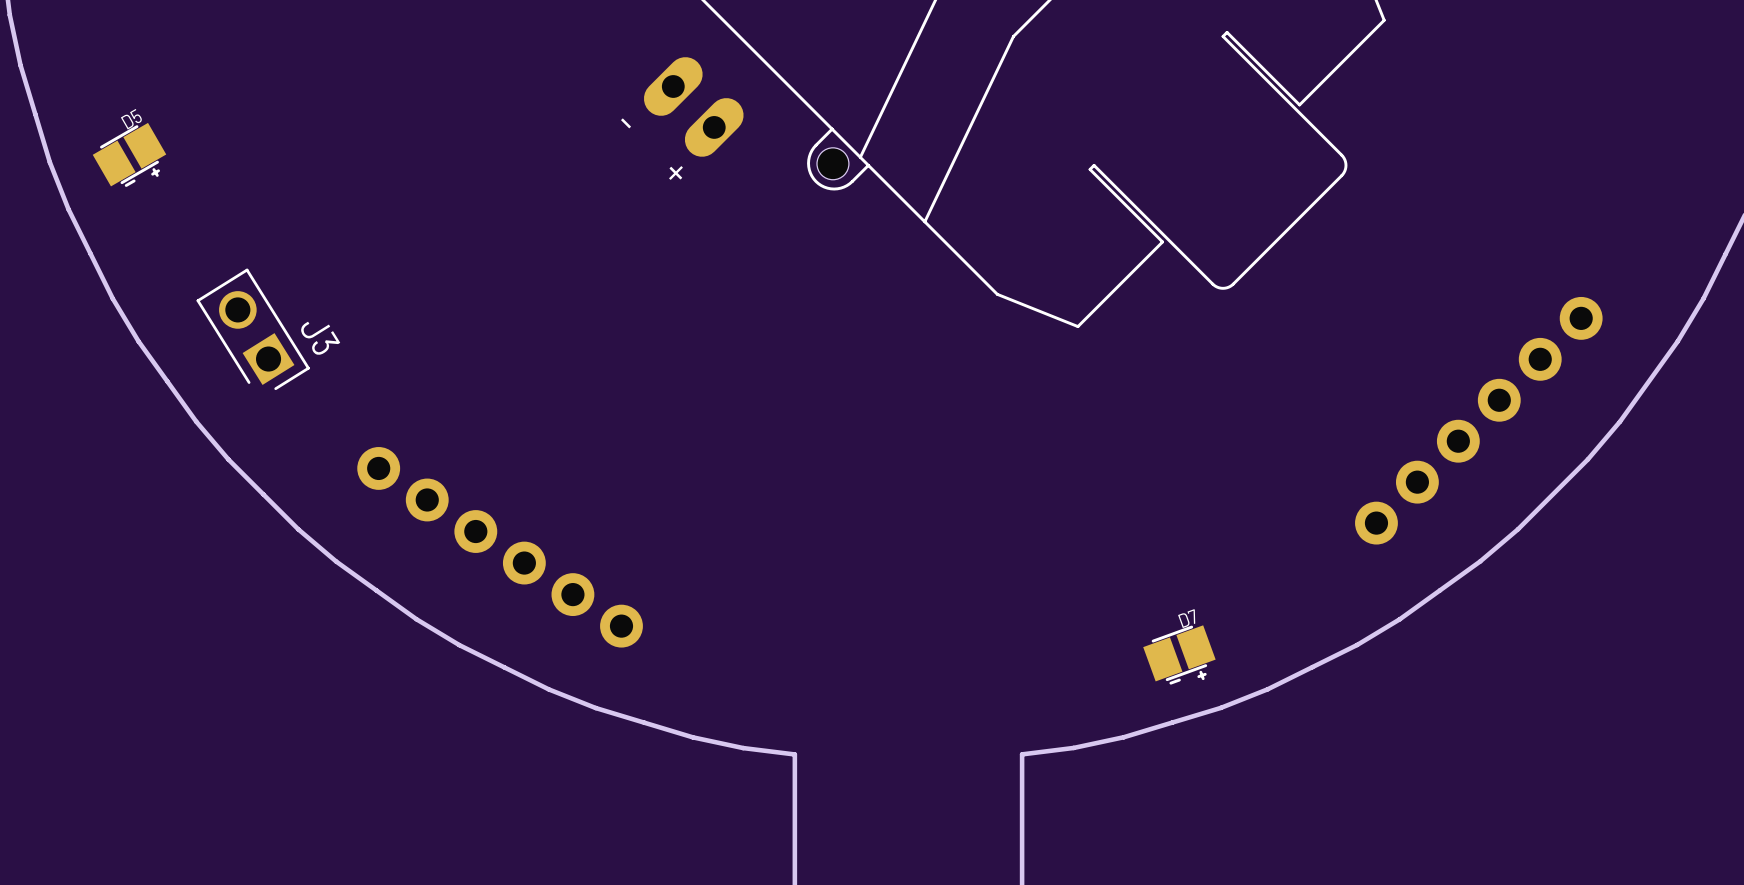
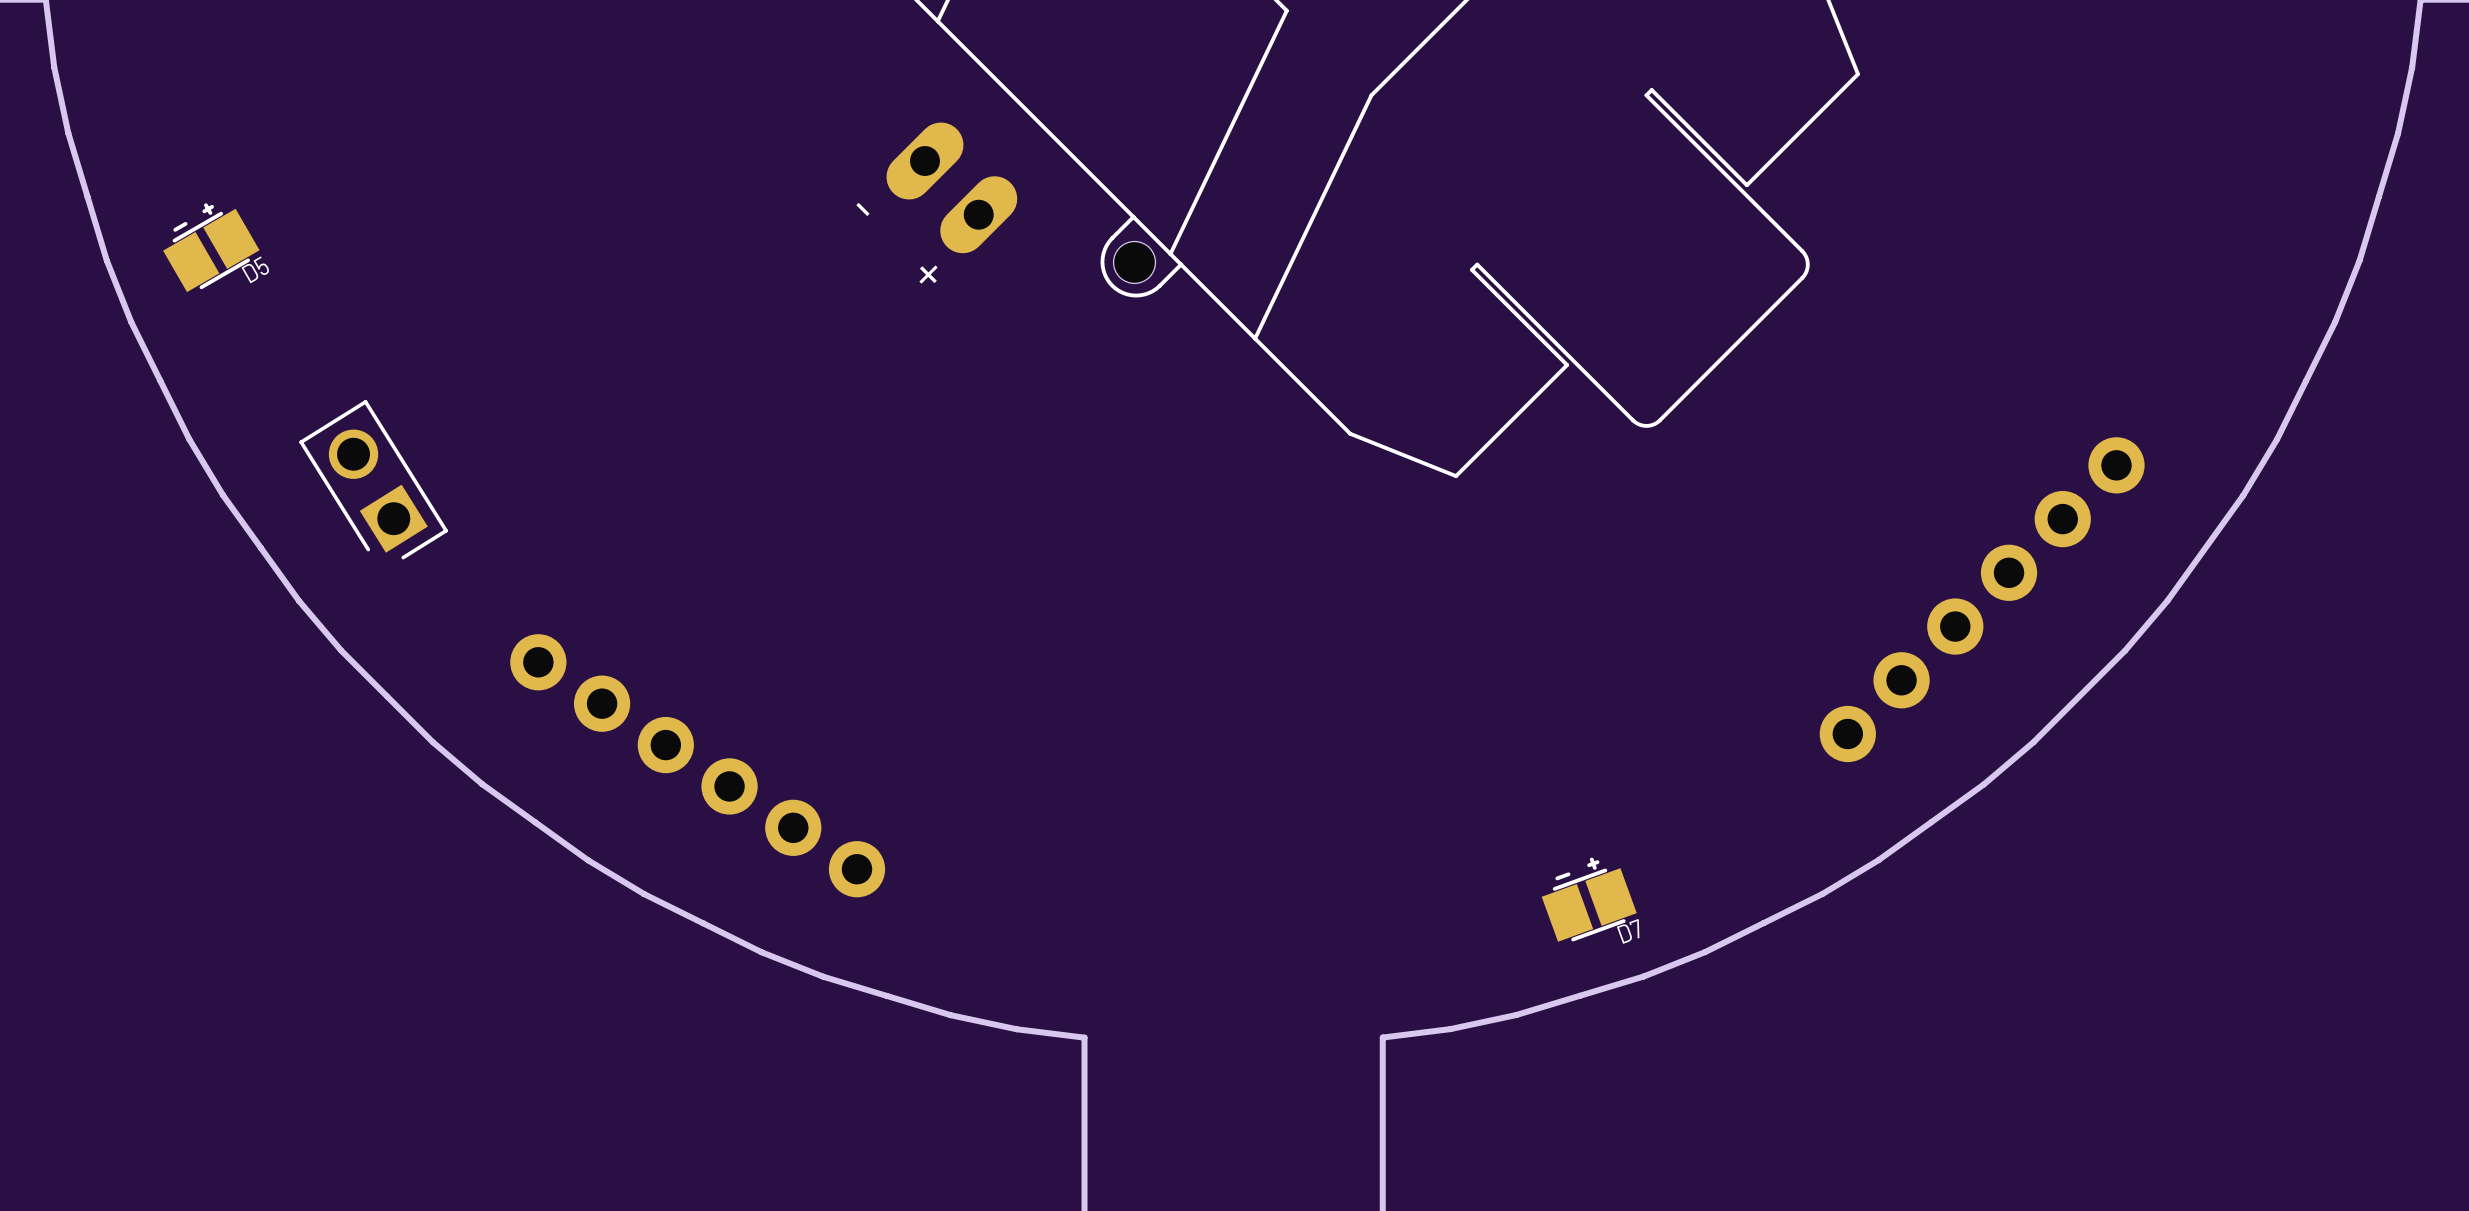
D5 name position: D5 (131, 119) -> D5 (255, 269)
D5 footprint: [92, 122, 167, 187] -> [163, 203, 260, 293]
J3 name: J3 (320, 338) -> none
D7 name position: D7 (1186, 618) -> D7 (1628, 931)
D7 footprint: [1143, 625, 1216, 685] -> [1541, 857, 1637, 942]

